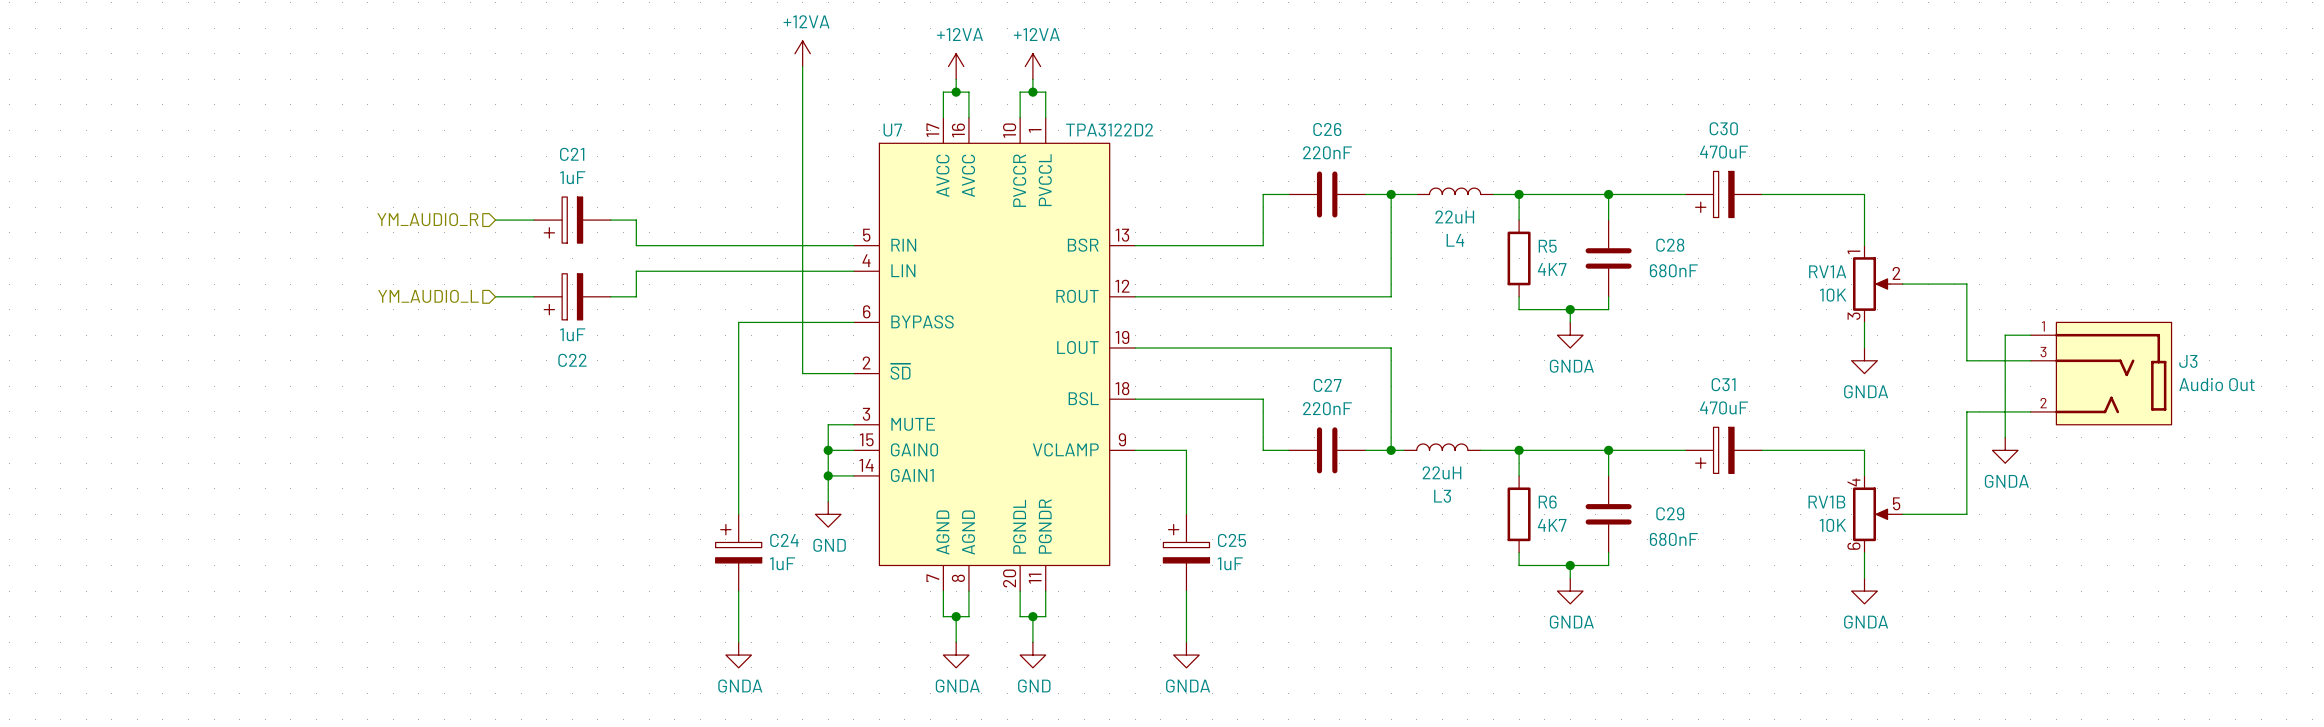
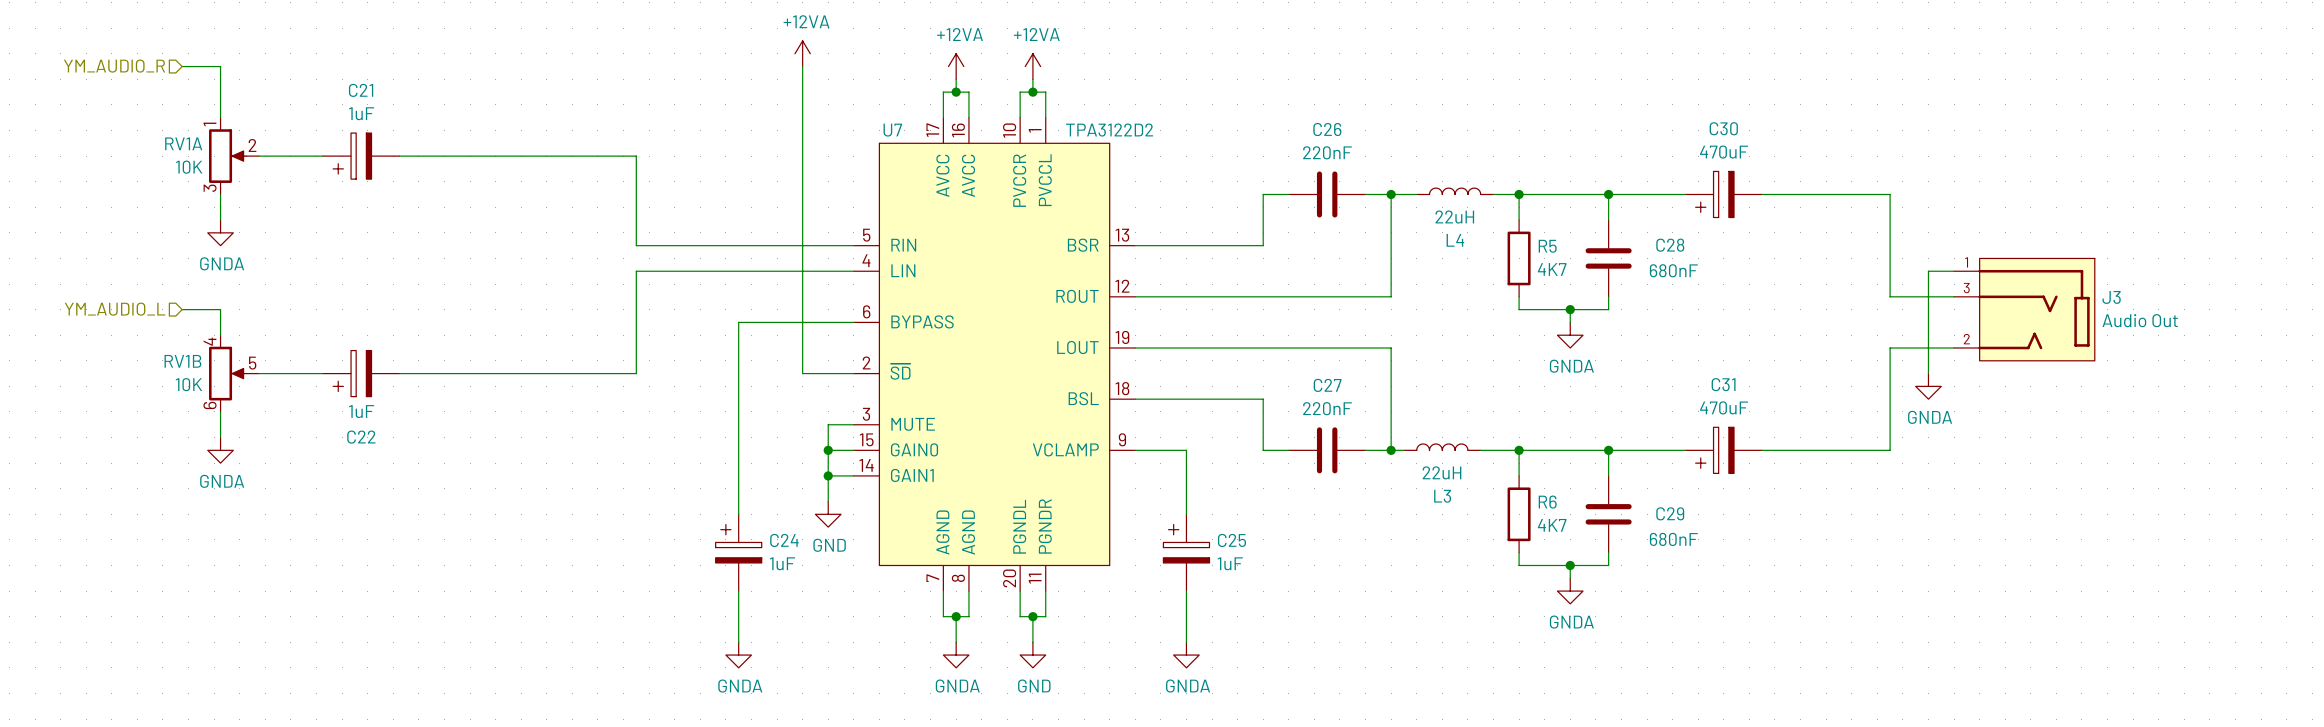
hierarchical label: none -> YM_AUDIO_R (114, 66)
wire: none -> (182, 66) (220, 66) (220, 117)
wire: none -> (258, 156) (322, 156)
wire: none -> (220, 194) (220, 220)
wire: (1864, 194) (1864, 245) -> (1864, 194) (1890, 194) (1890, 296) (1954, 296)
hierarchical label: YM_AUDIO_R (427, 219) -> none
wire: (495, 220) (533, 220) -> none
C21 position: (572, 220) -> (361, 156)
wire: (610, 220) (636, 220) -> (399, 156) (636, 156) (636, 220)
power symbol: none -> GNDA (220, 232)
RV1A position: (1877, 284) -> (233, 156)
wire: (1902, 284) (1966, 284) (1966, 360) (2030, 360) -> none
hierarchical label: YM_AUDIO_L (428, 296) -> none
wire: (495, 296) (533, 296) -> none
C22 position: (572, 296) -> (361, 373)
wire: (610, 296) (636, 296) -> (399, 373) (636, 373) (636, 296)
hierarchical label: none -> YM_AUDIO_L (115, 309)
wire: none -> (182, 309) (220, 309) (220, 335)
wire: (1864, 322) (1864, 348) -> none
wire: (2030, 335) (2005, 335) (2005, 437) -> (1954, 271) (1928, 271) (1928, 373)
power symbol: GNDA (1864, 360) -> none
wire: none -> (258, 373) (322, 373)
J3 position: (2101, 373) -> (2024, 309)
power symbol: none -> GNDA (1928, 386)
wire: none -> (220, 411) (220, 437)
wire: (2030, 411) (1966, 411) (1966, 514) (1902, 514) -> none
power symbol: none -> GNDA (220, 450)
wire: (1864, 450) (1864, 475) -> (1864, 450) (1890, 450) (1890, 348) (1954, 348)
power symbol: GNDA (2005, 450) -> none
RV1B position: (1877, 514) -> (233, 373)
wire: (1864, 552) (1864, 578) -> none
power symbol: GNDA (1864, 591) -> none

